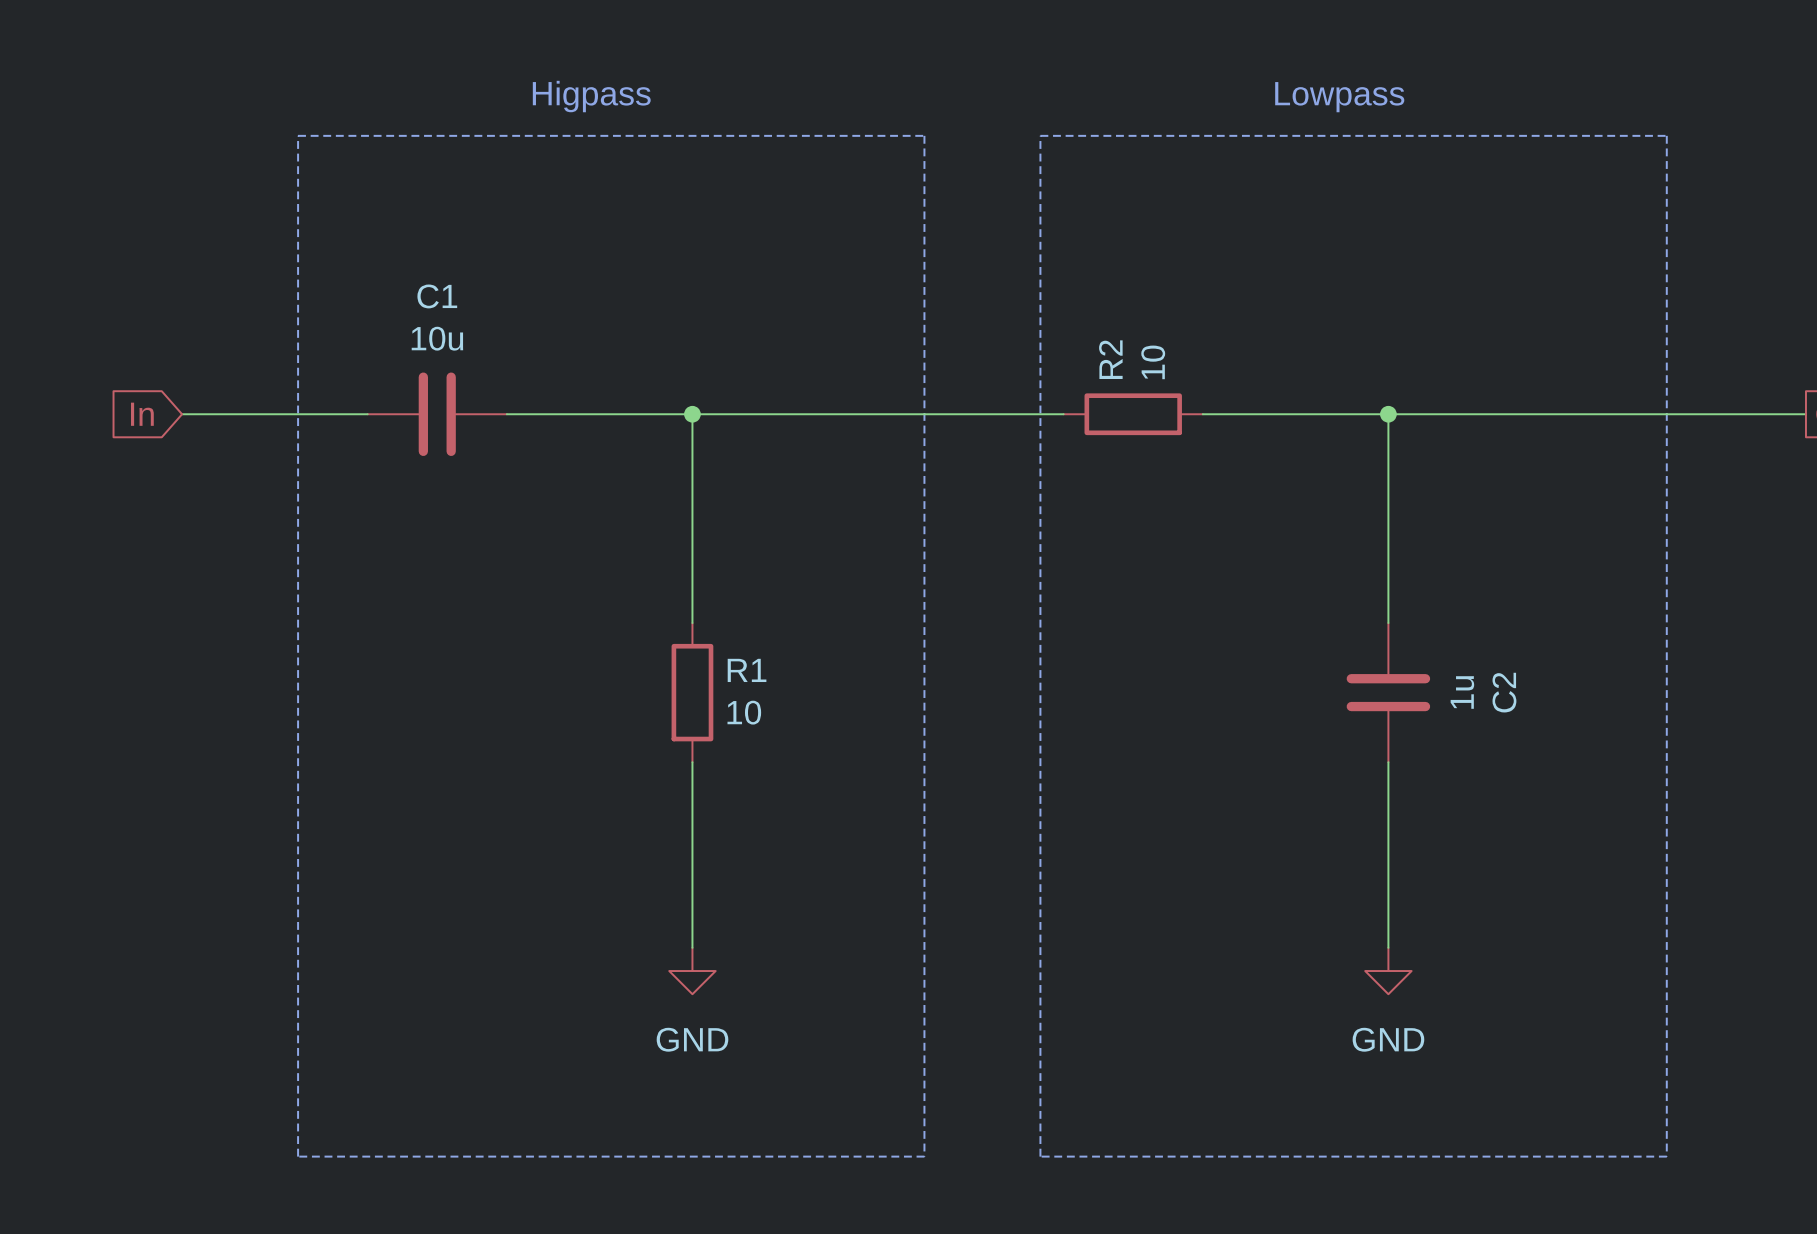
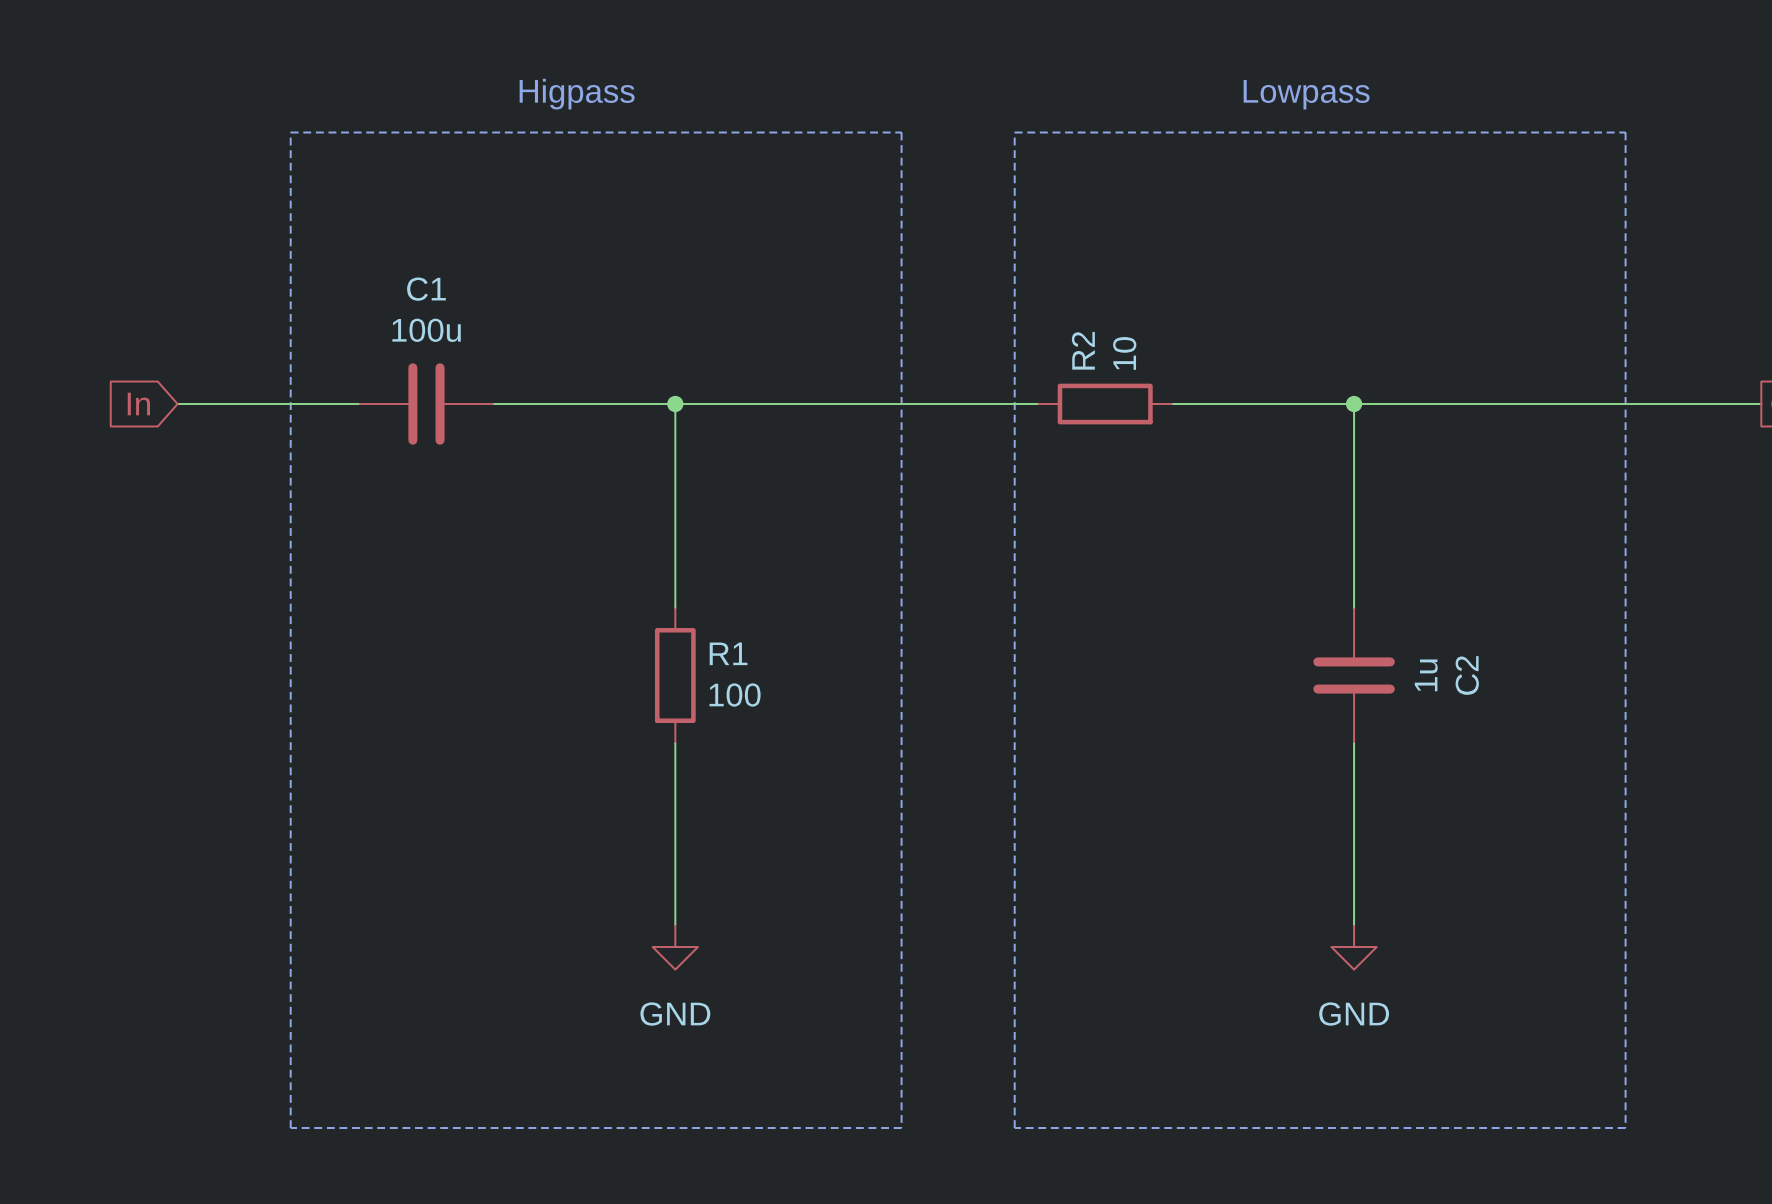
C1 value: 10u (437, 338) -> 100u (426, 330)
R1 value: 10 (744, 712) -> 100 (735, 695)

